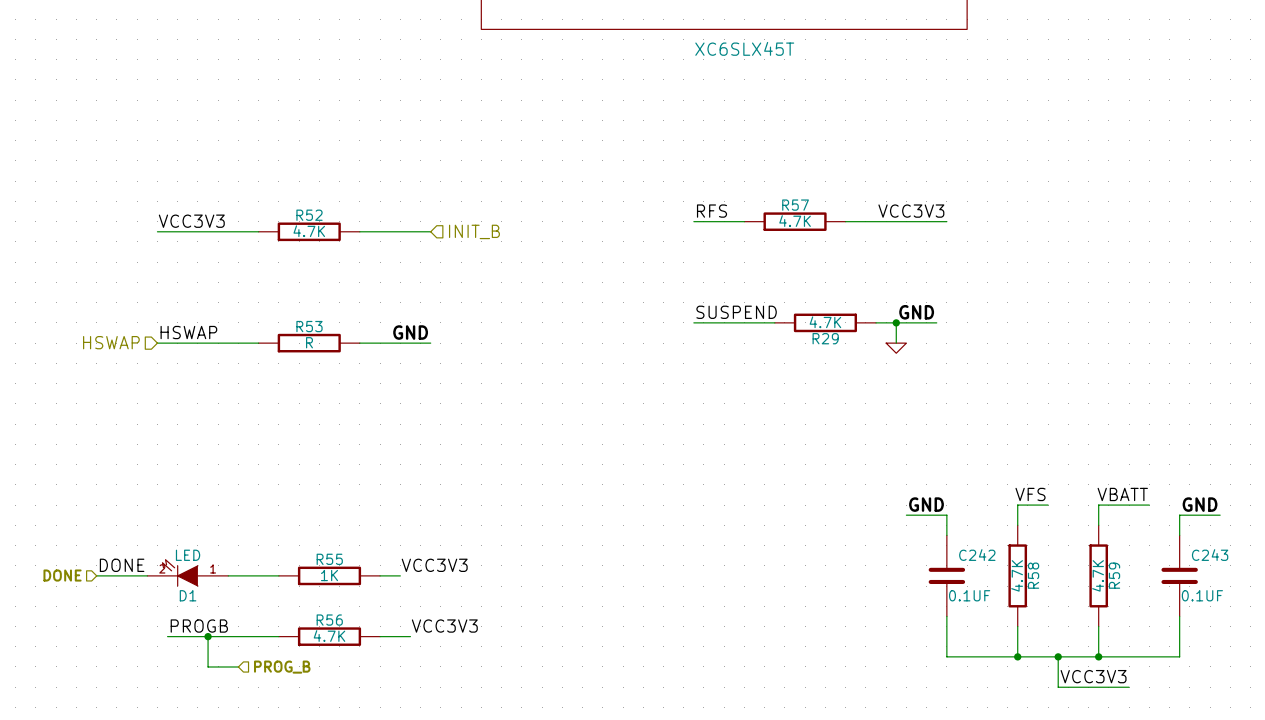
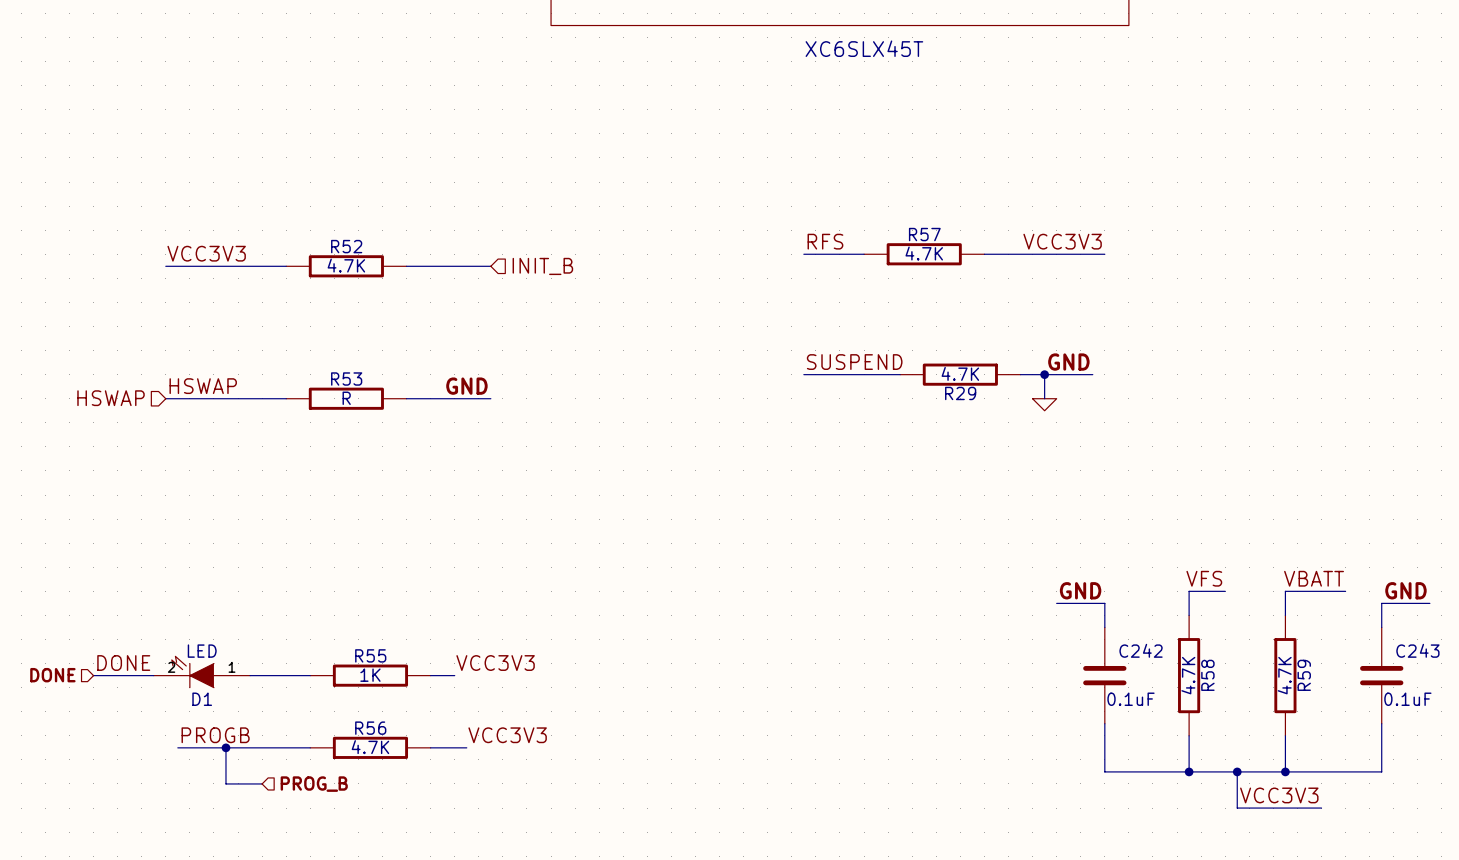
C242 value: 0.1UF (969, 595) -> 0.1uF (1131, 699)
C243 value: 0.1UF (1202, 595) -> 0.1uF (1407, 699)

